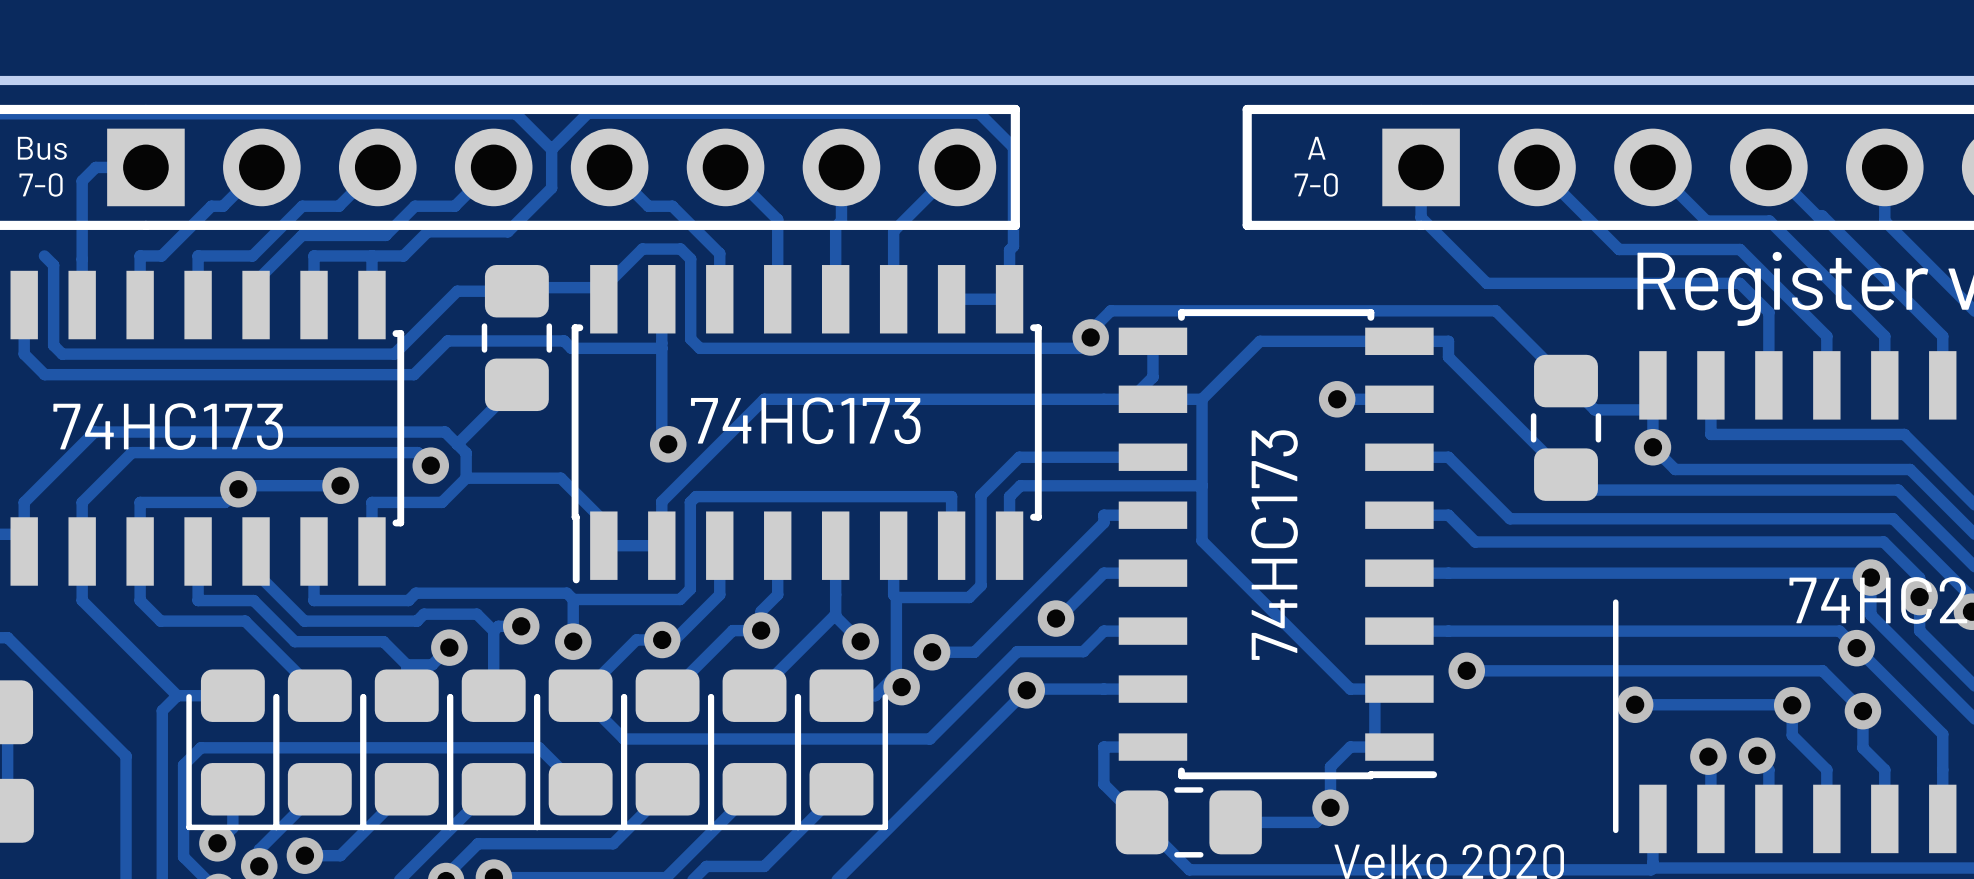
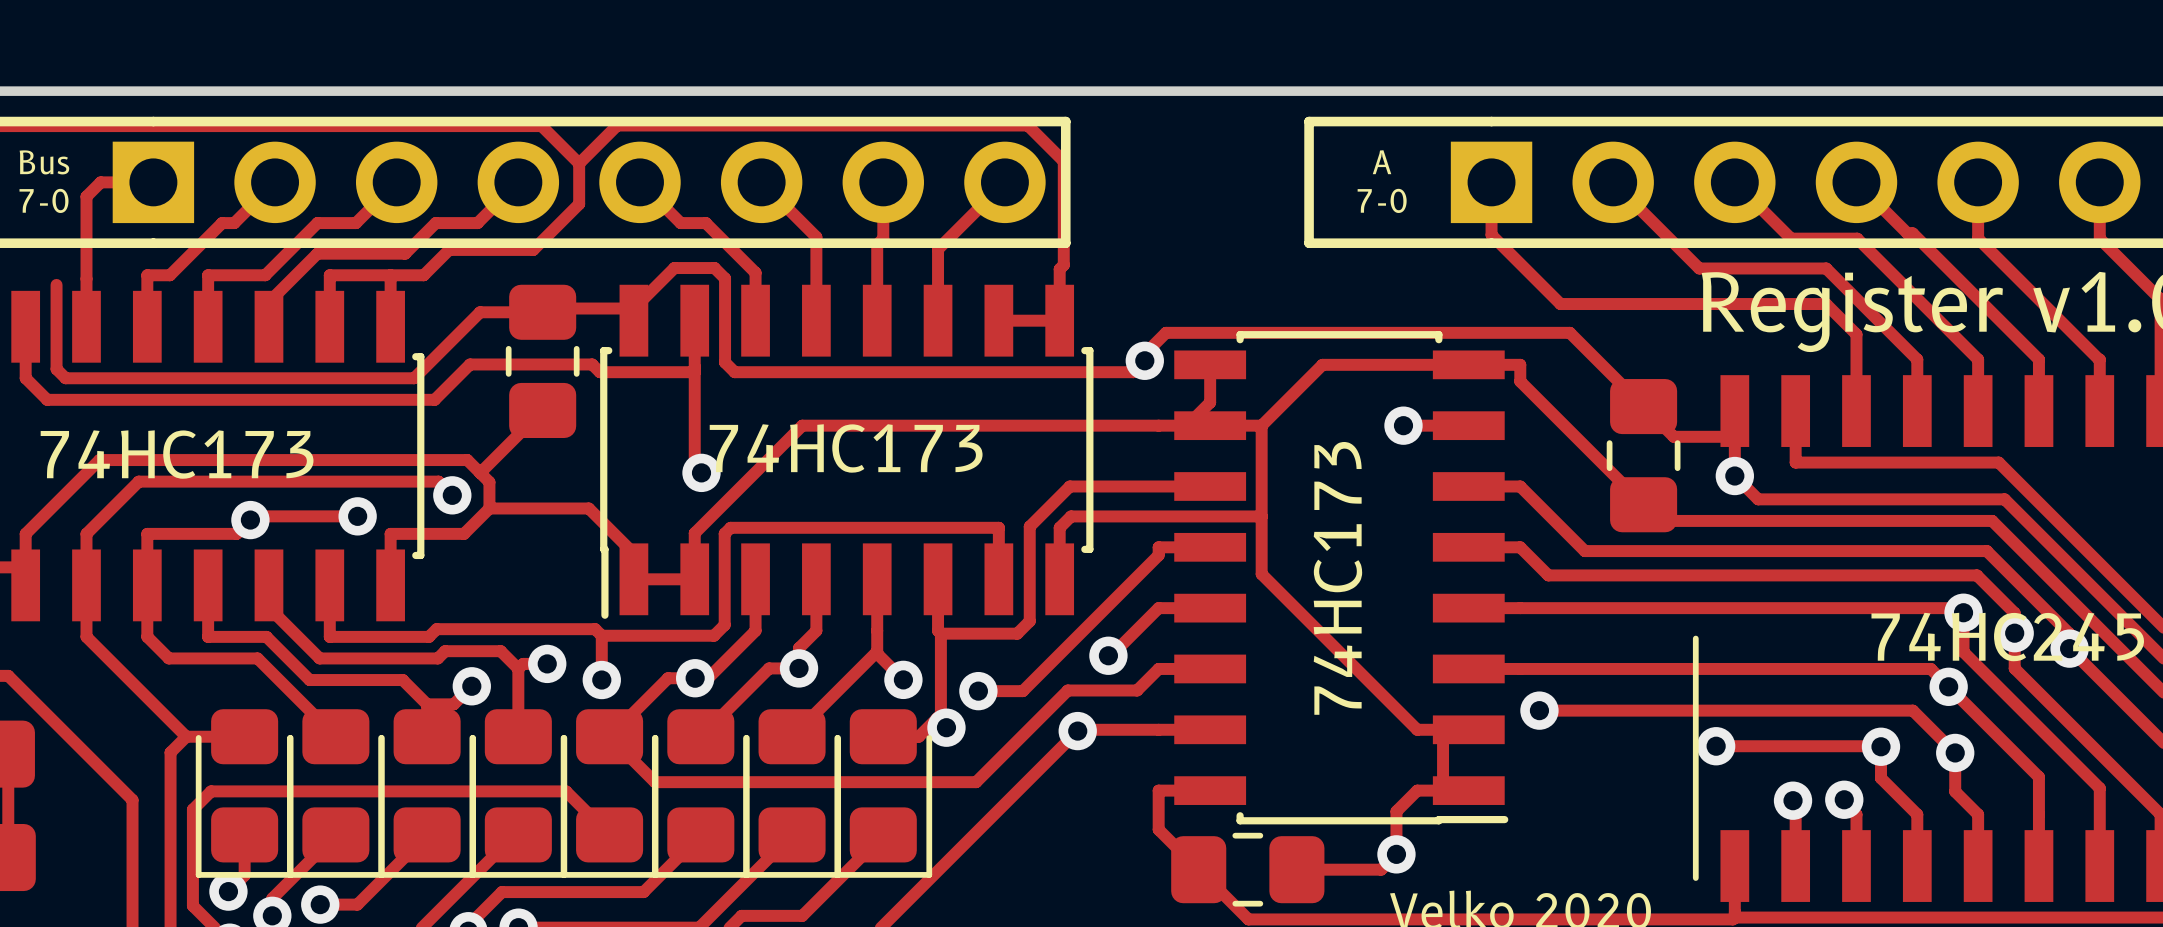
track: (44, 255) (53, 265) -> none

